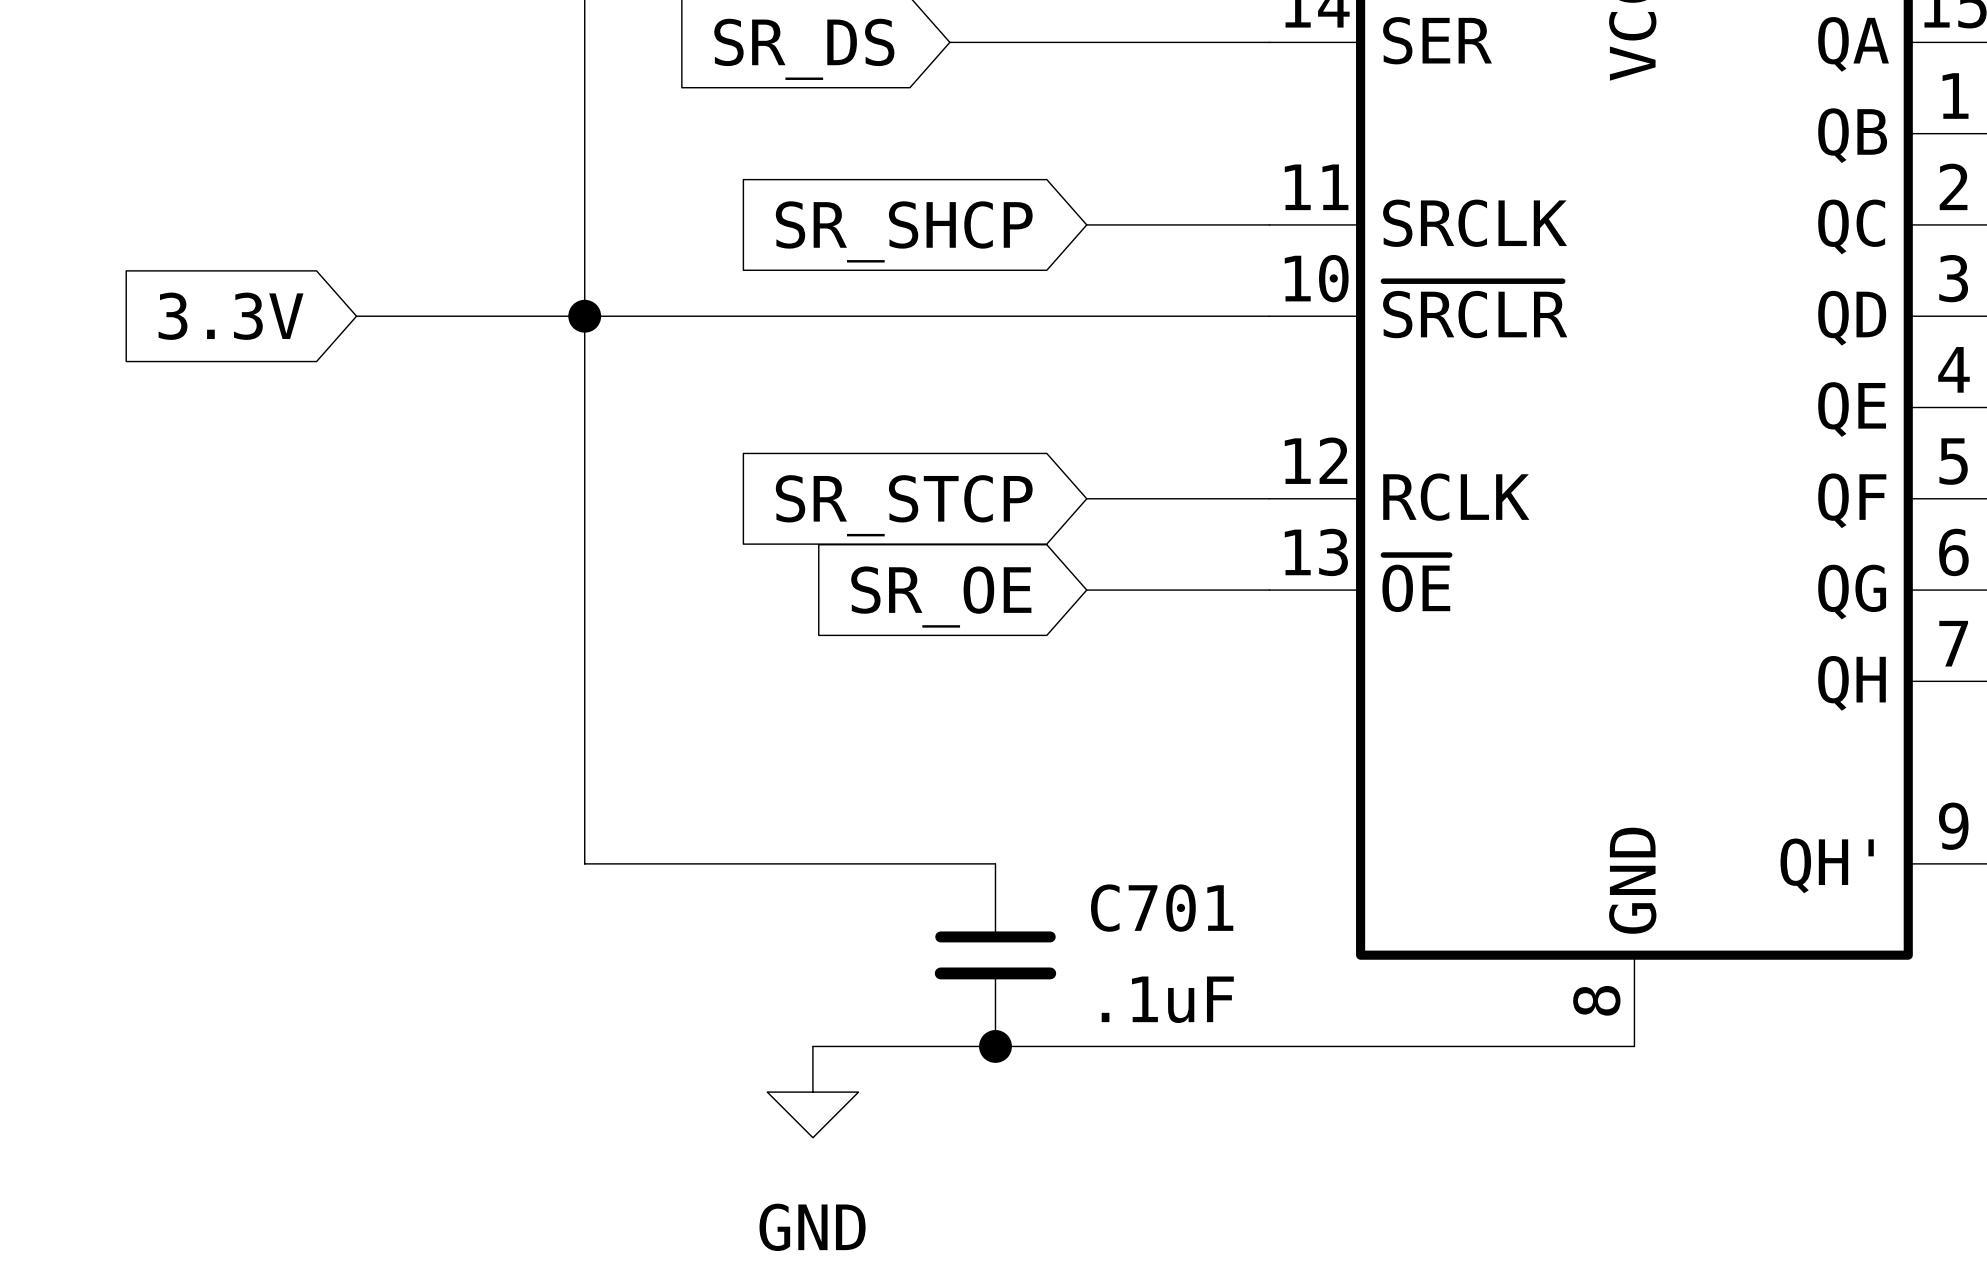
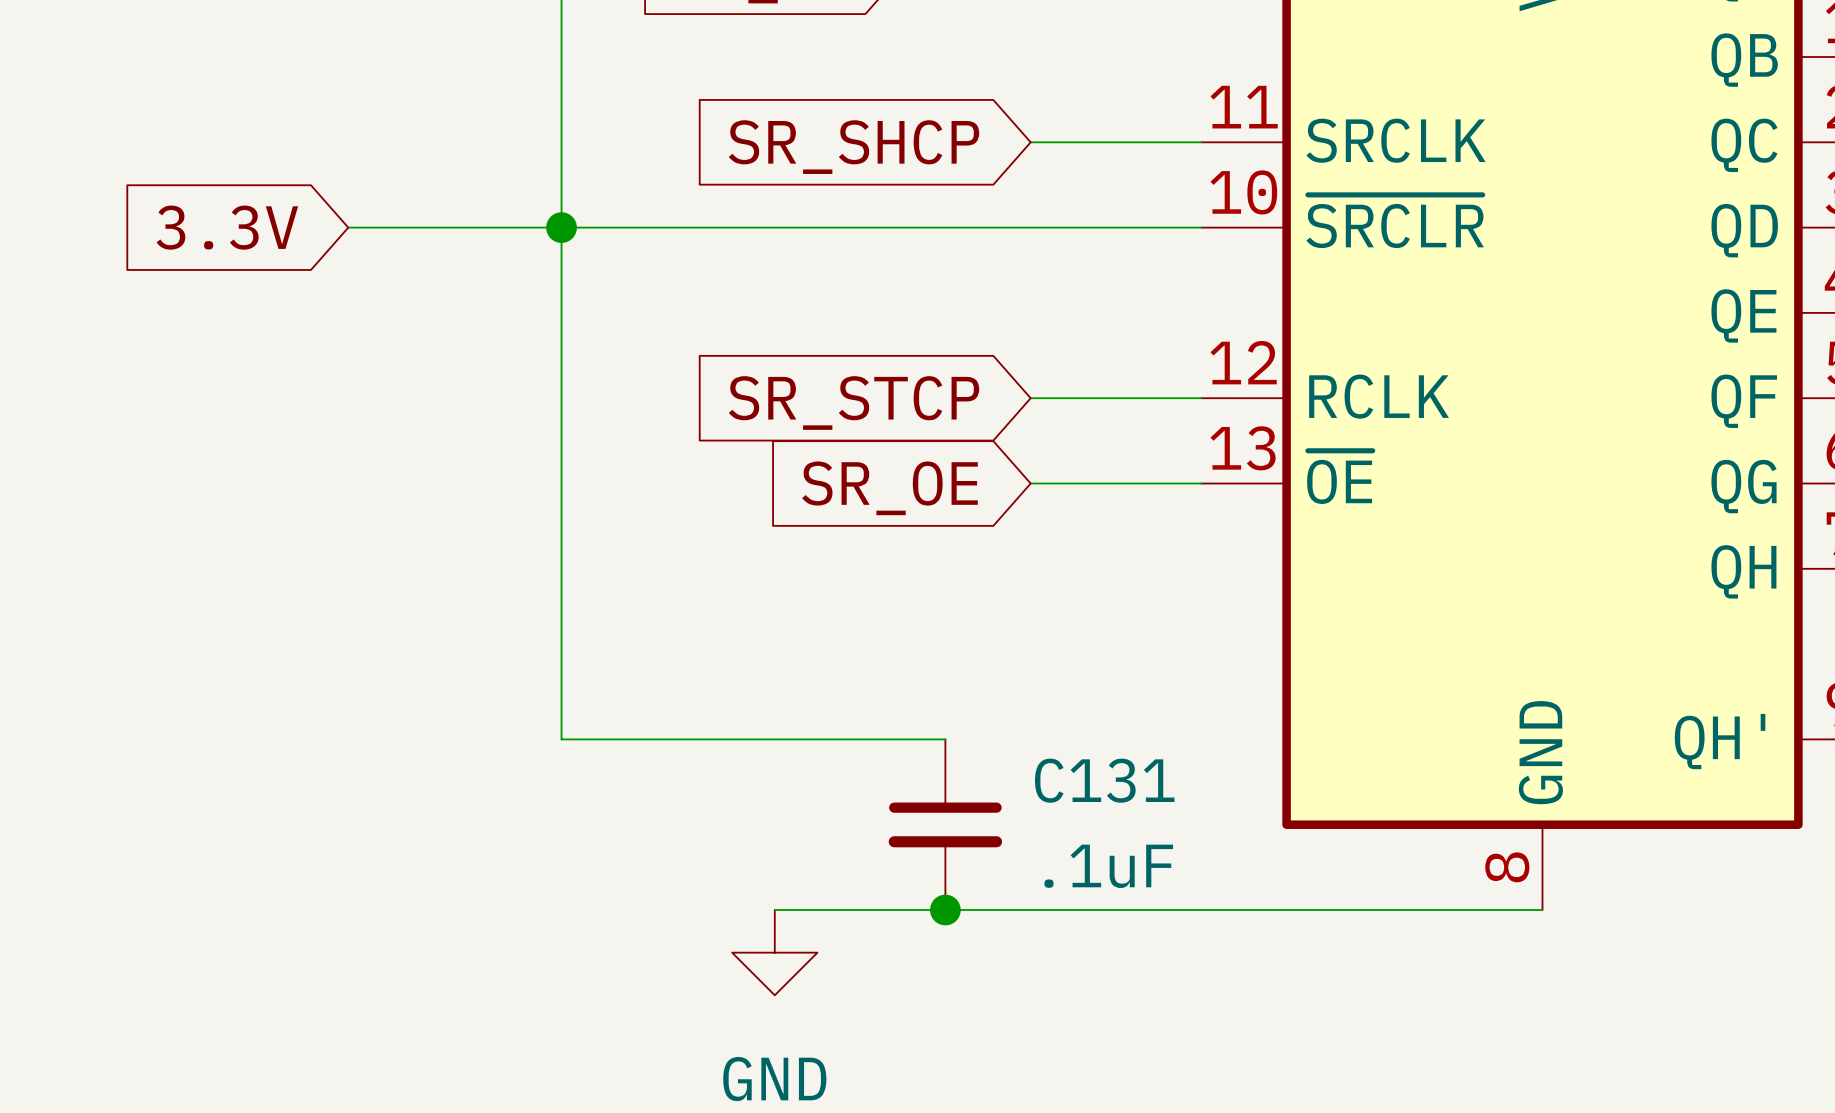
C701 name: C701 (1162, 908) -> C131 (1104, 780)

